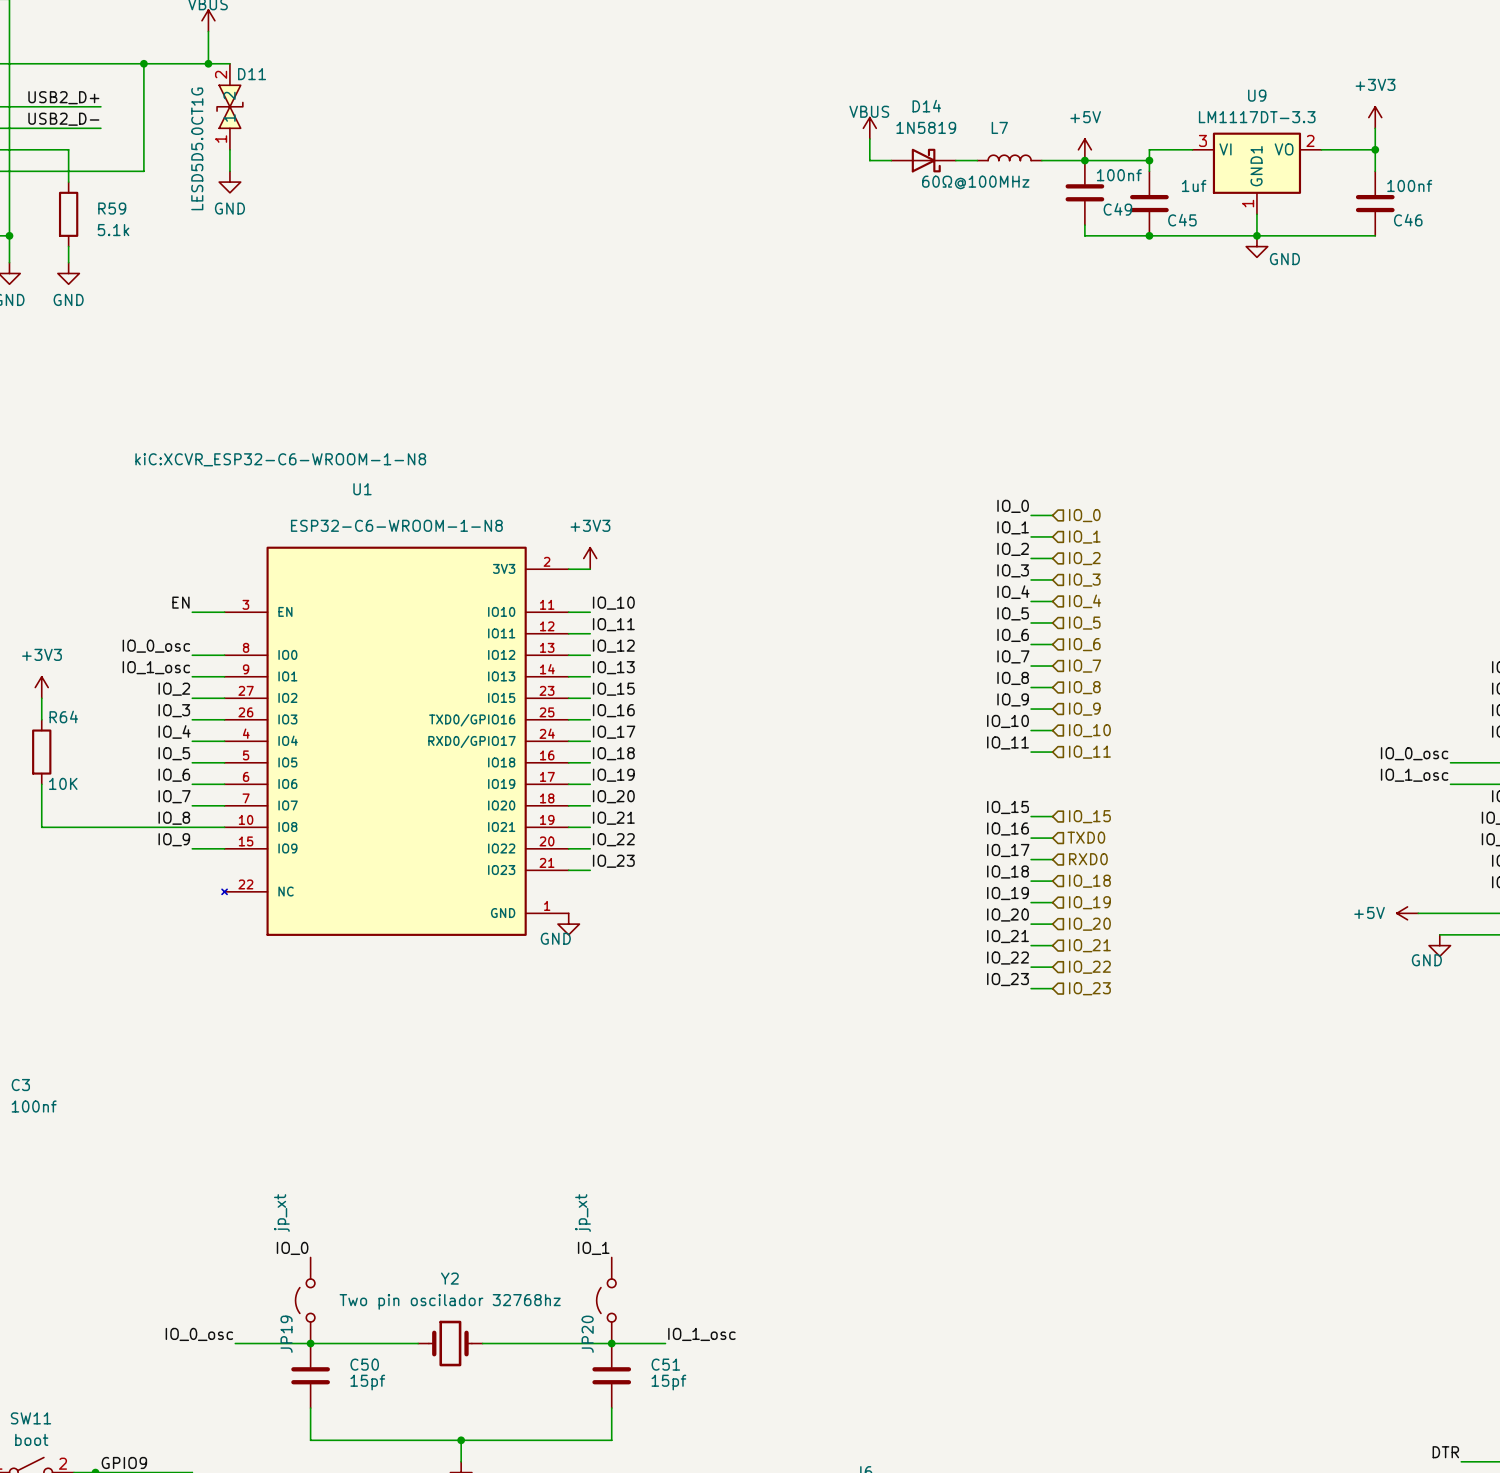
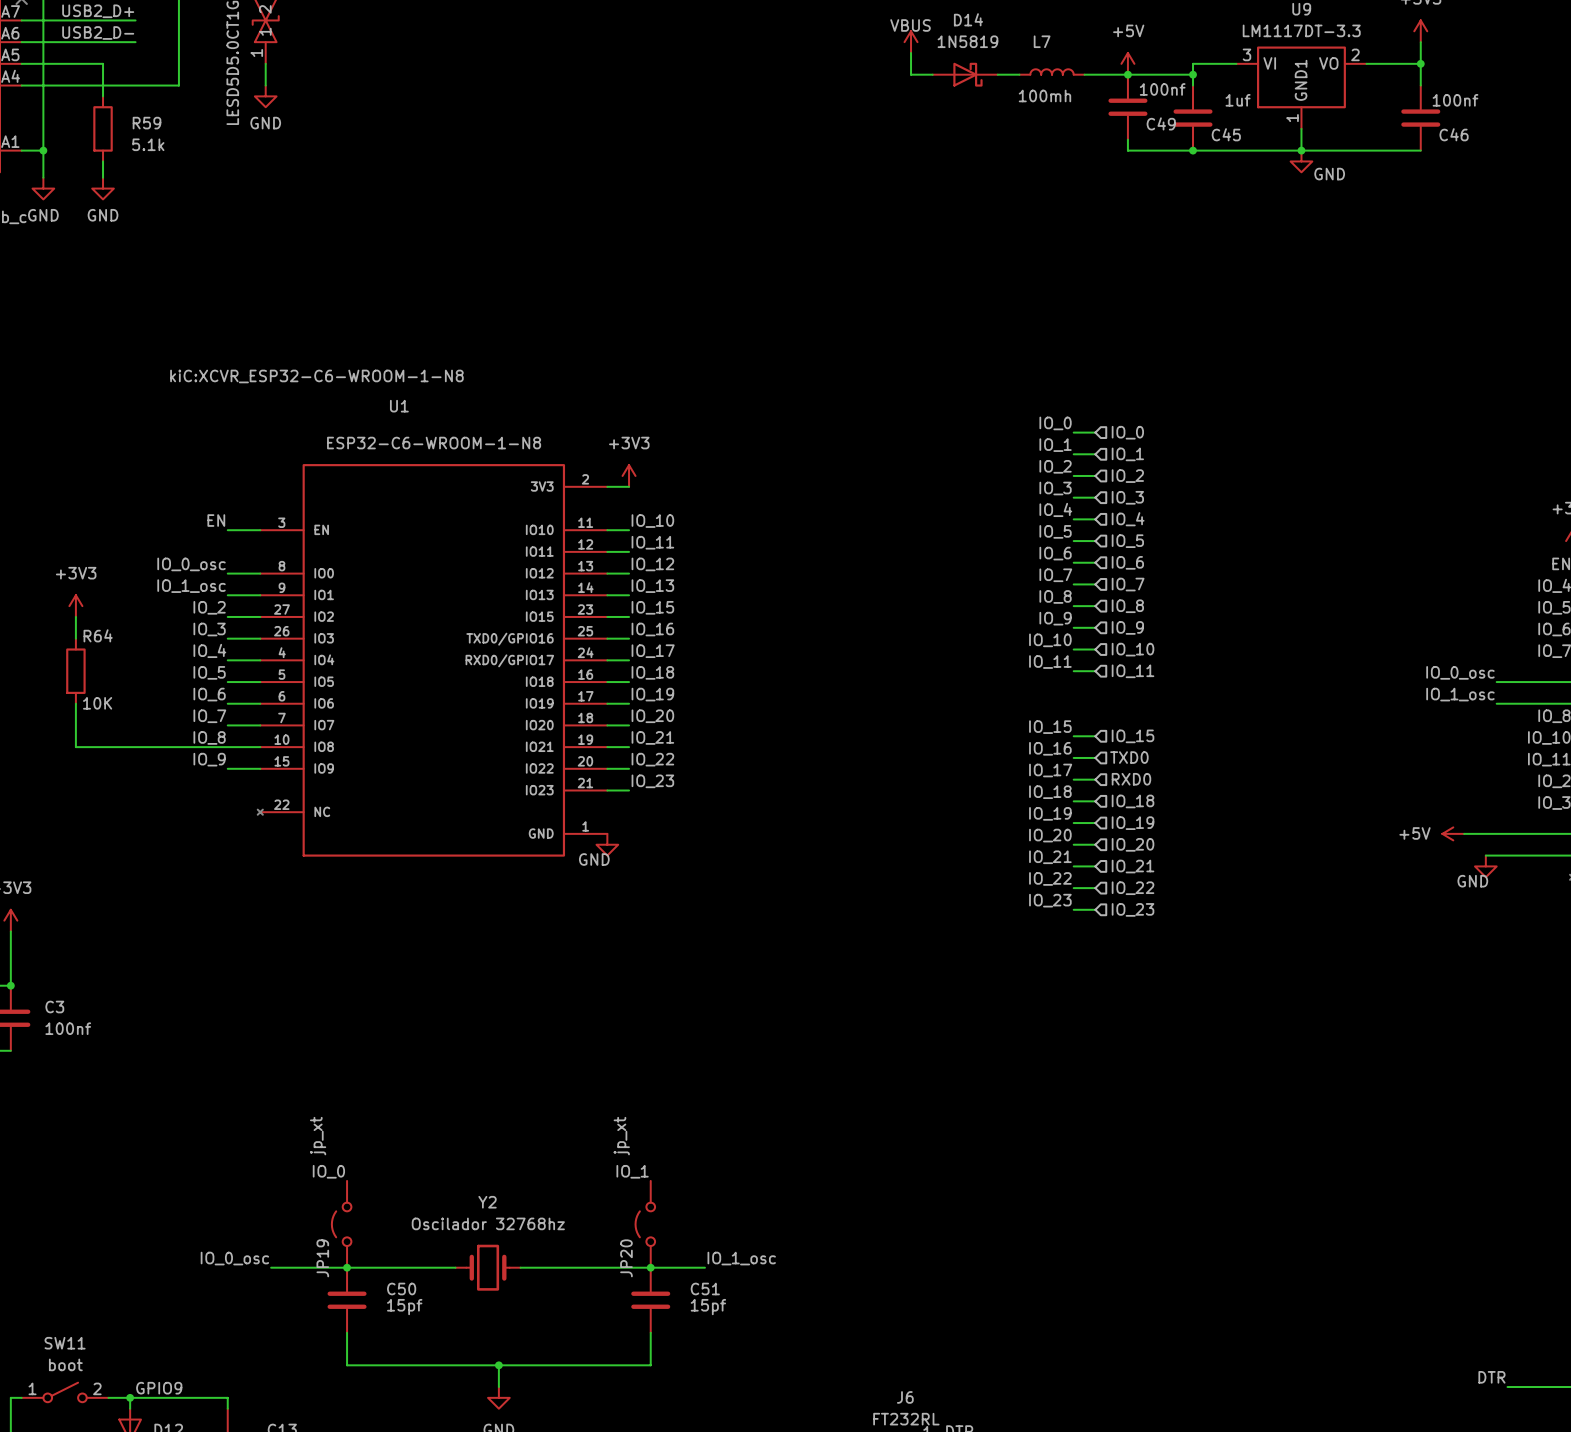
L7 value: 60Ω@100MHz (975, 182) -> 100mh (1044, 95)
Y2 value: Two pin oscilador 32768hz (450, 1301) -> Oscilador 32768hz (488, 1223)

